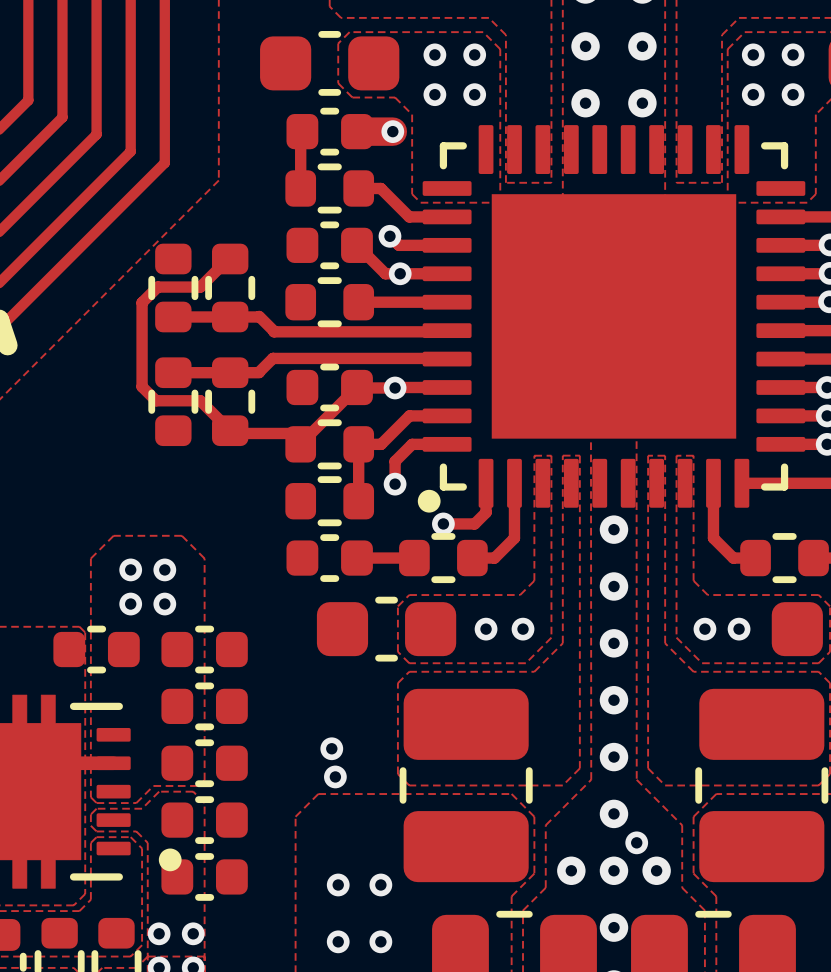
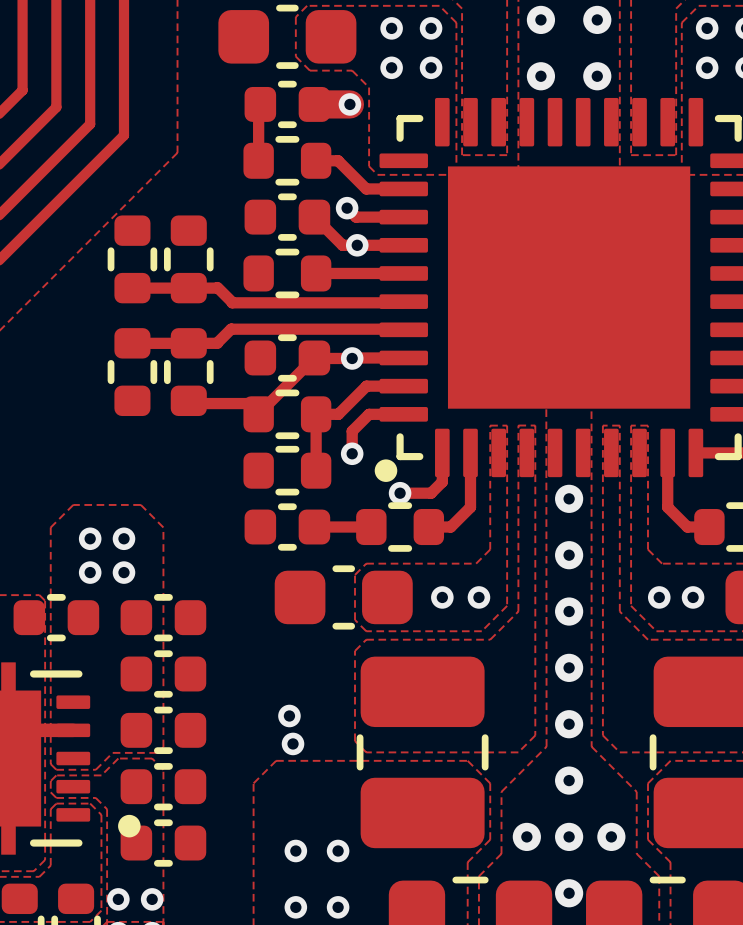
track: (230, 258) (200, 287) (157, 287) (142, 302) (142, 386) (156, 400) (200, 400) (230, 430) -> none
via: (636, 842) -> none

